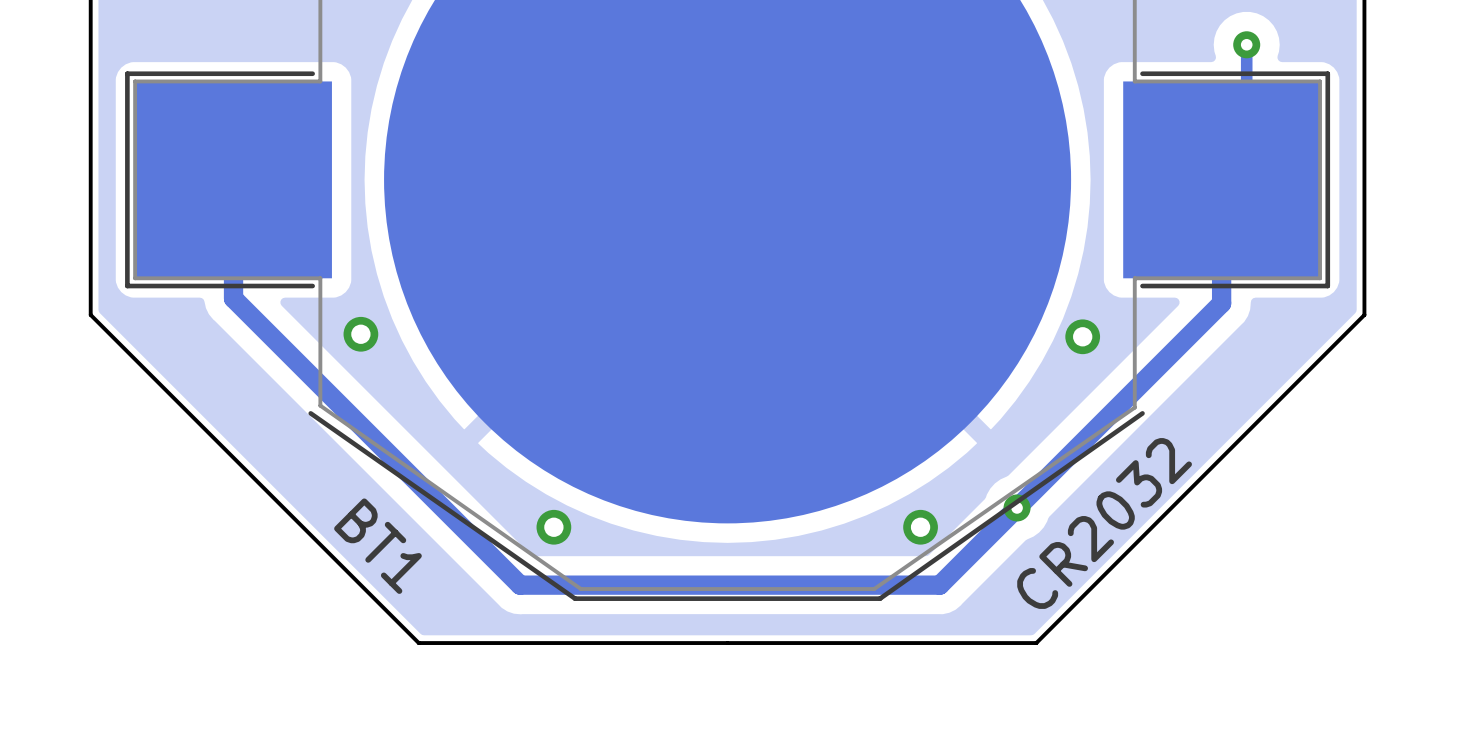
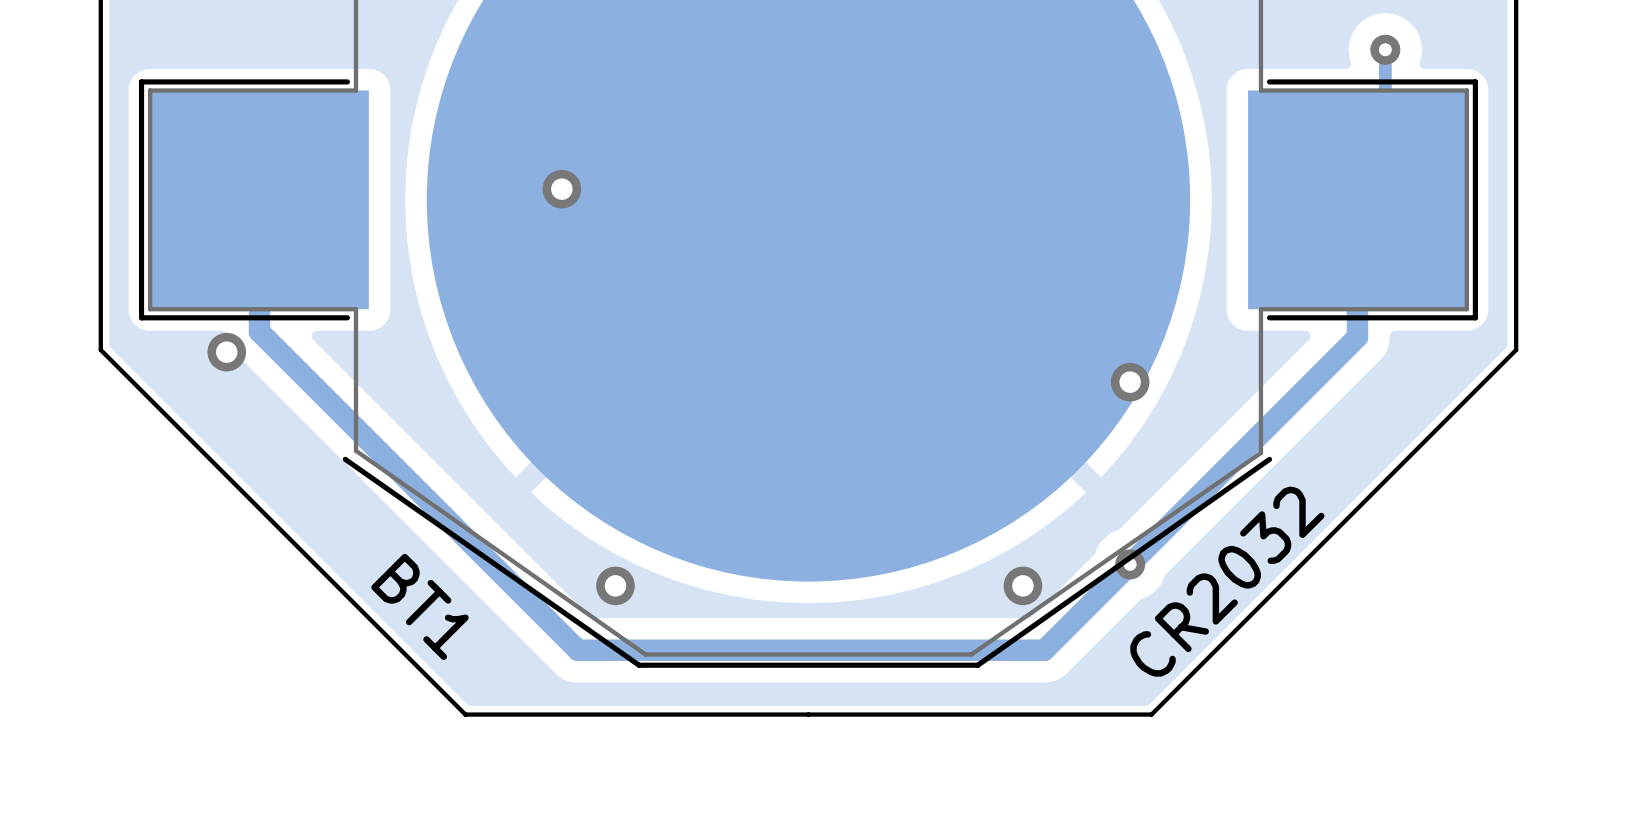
via: none -> (561, 189)
via: none -> (226, 352)
via: (360, 334) -> none
via position: (1082, 336) -> (1130, 382)

